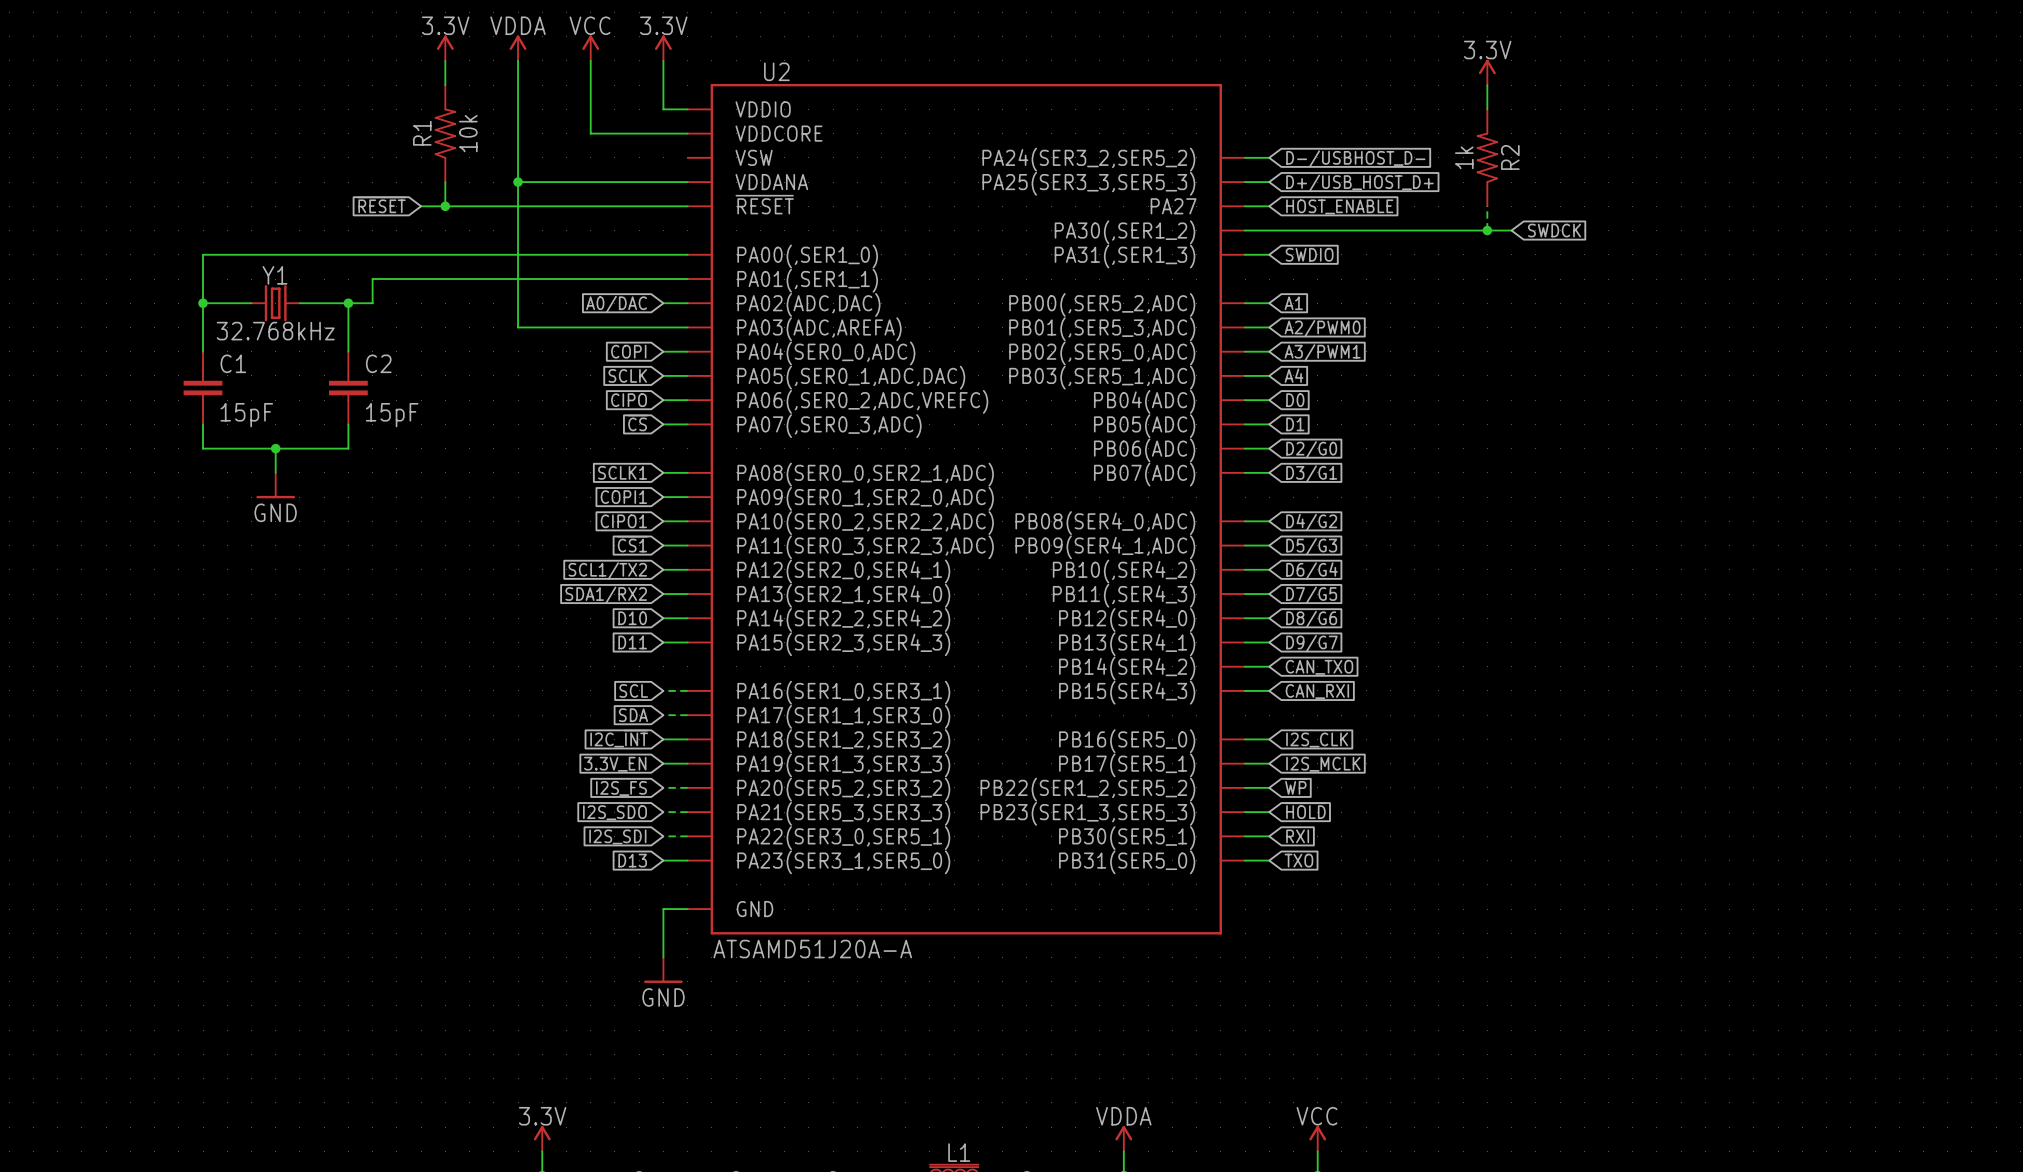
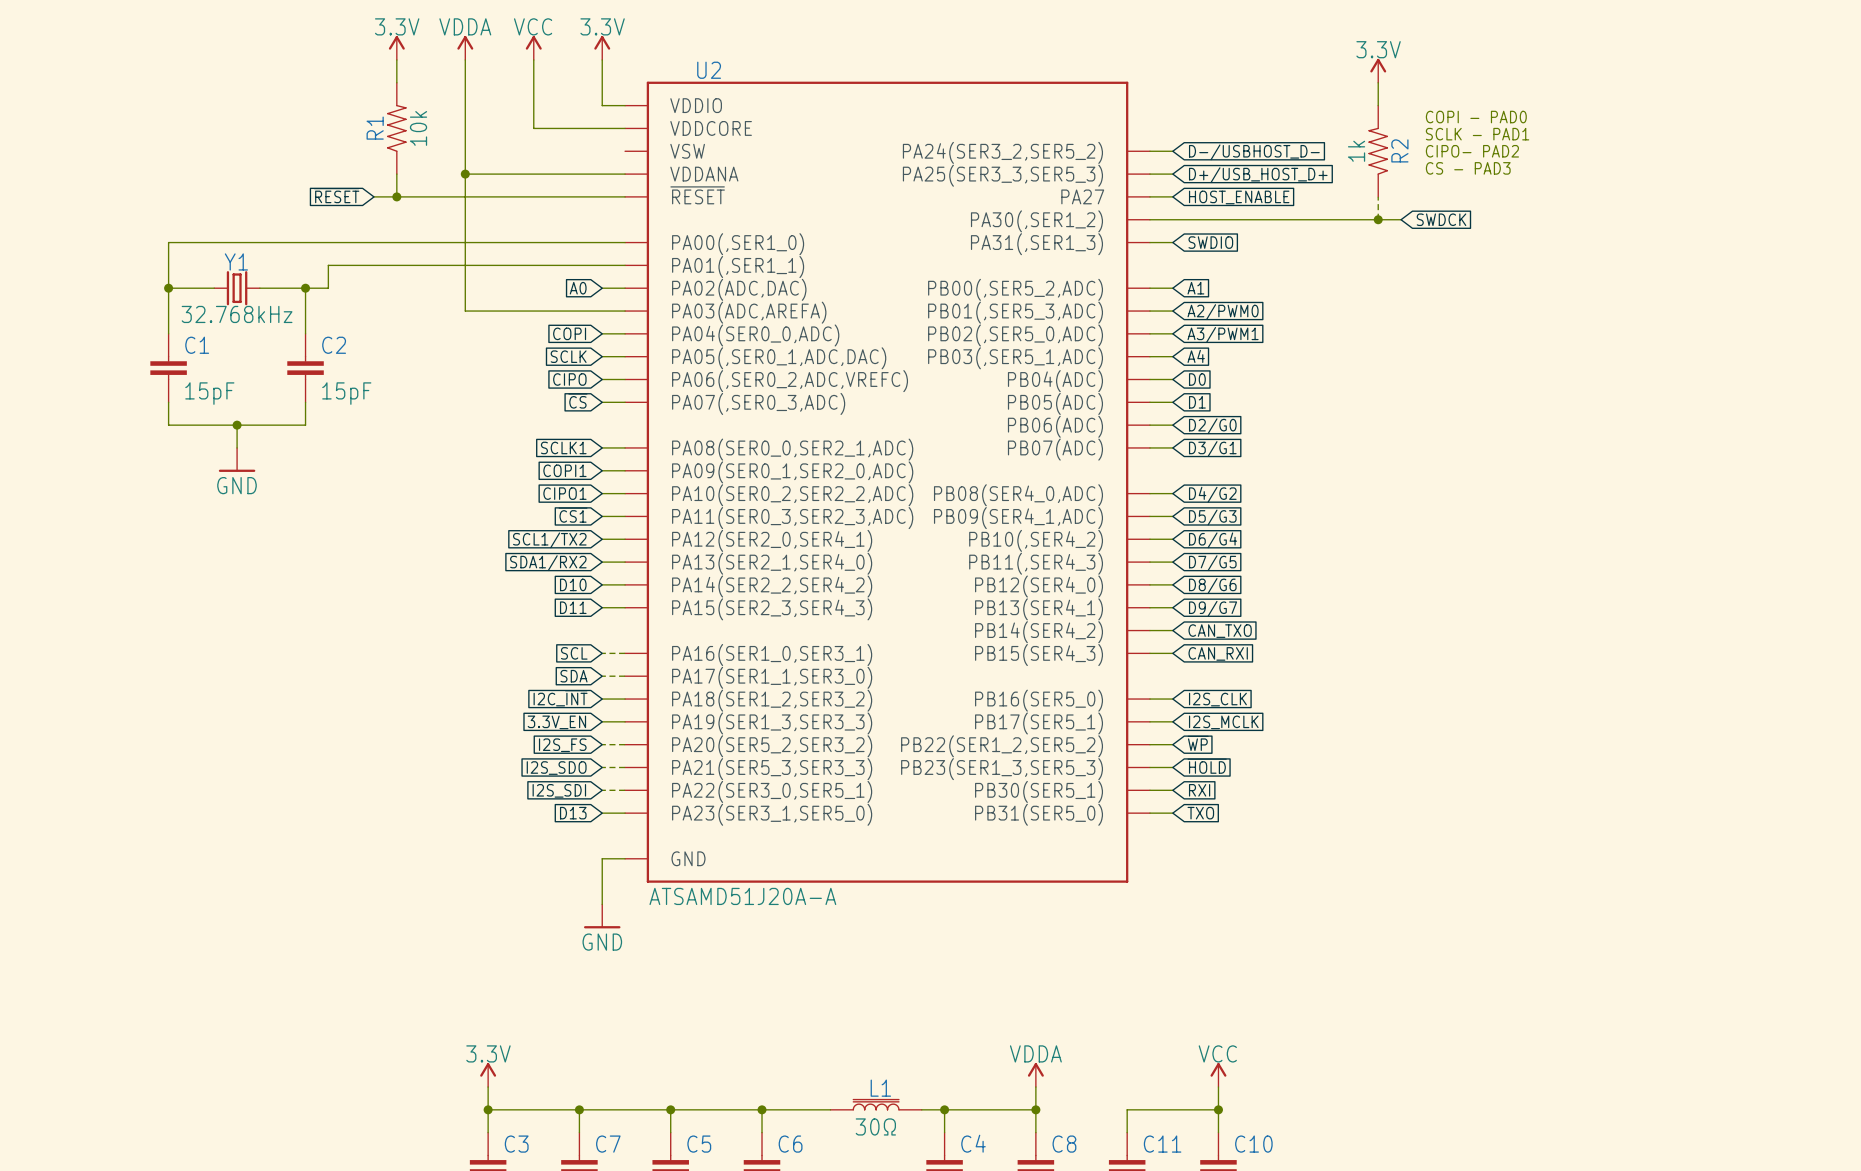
text: none -> COPI - PAD0 (1476, 117)
text: none -> SCLK - PAD1 (1477, 134)
text: none -> CIPO- PAD2 (1472, 151)
text: none -> CS - PAD3 (1468, 168)
global label: A0/DAC (616, 304) -> A0 (578, 288)

